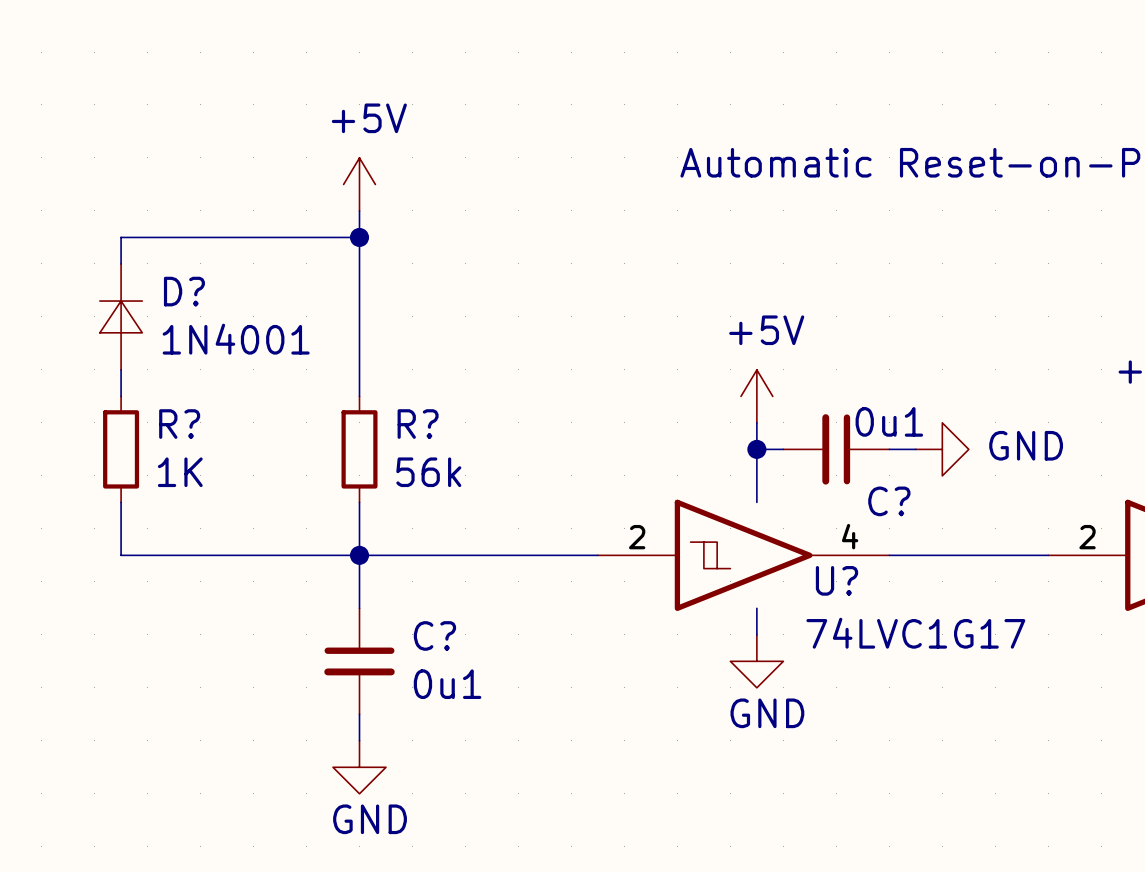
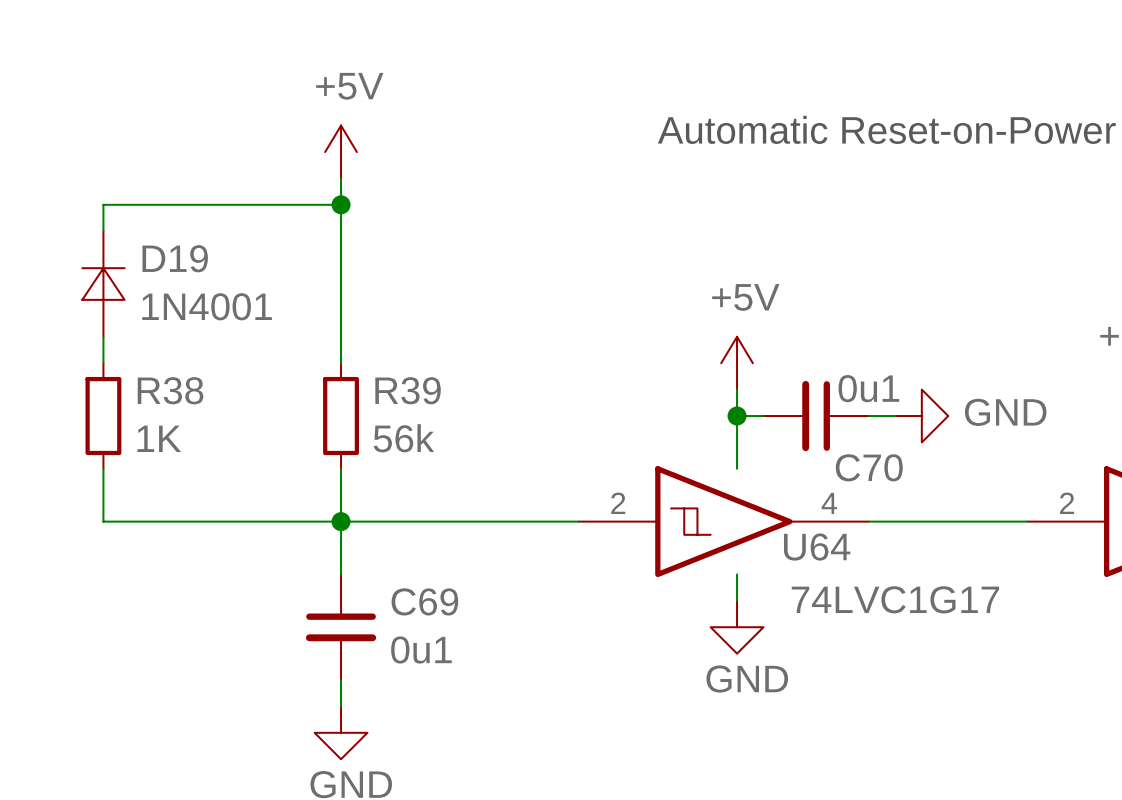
D? name: D? (184, 291) -> D19 (175, 258)
R? name: R? (179, 424) -> R38 (170, 390)
R? name: R? (418, 424) -> R39 (408, 390)
C? name: C? (889, 501) -> C70 (869, 467)
U? name: U? (836, 580) -> U64 (817, 547)
C? name: C? (434, 635) -> C69 (424, 601)

